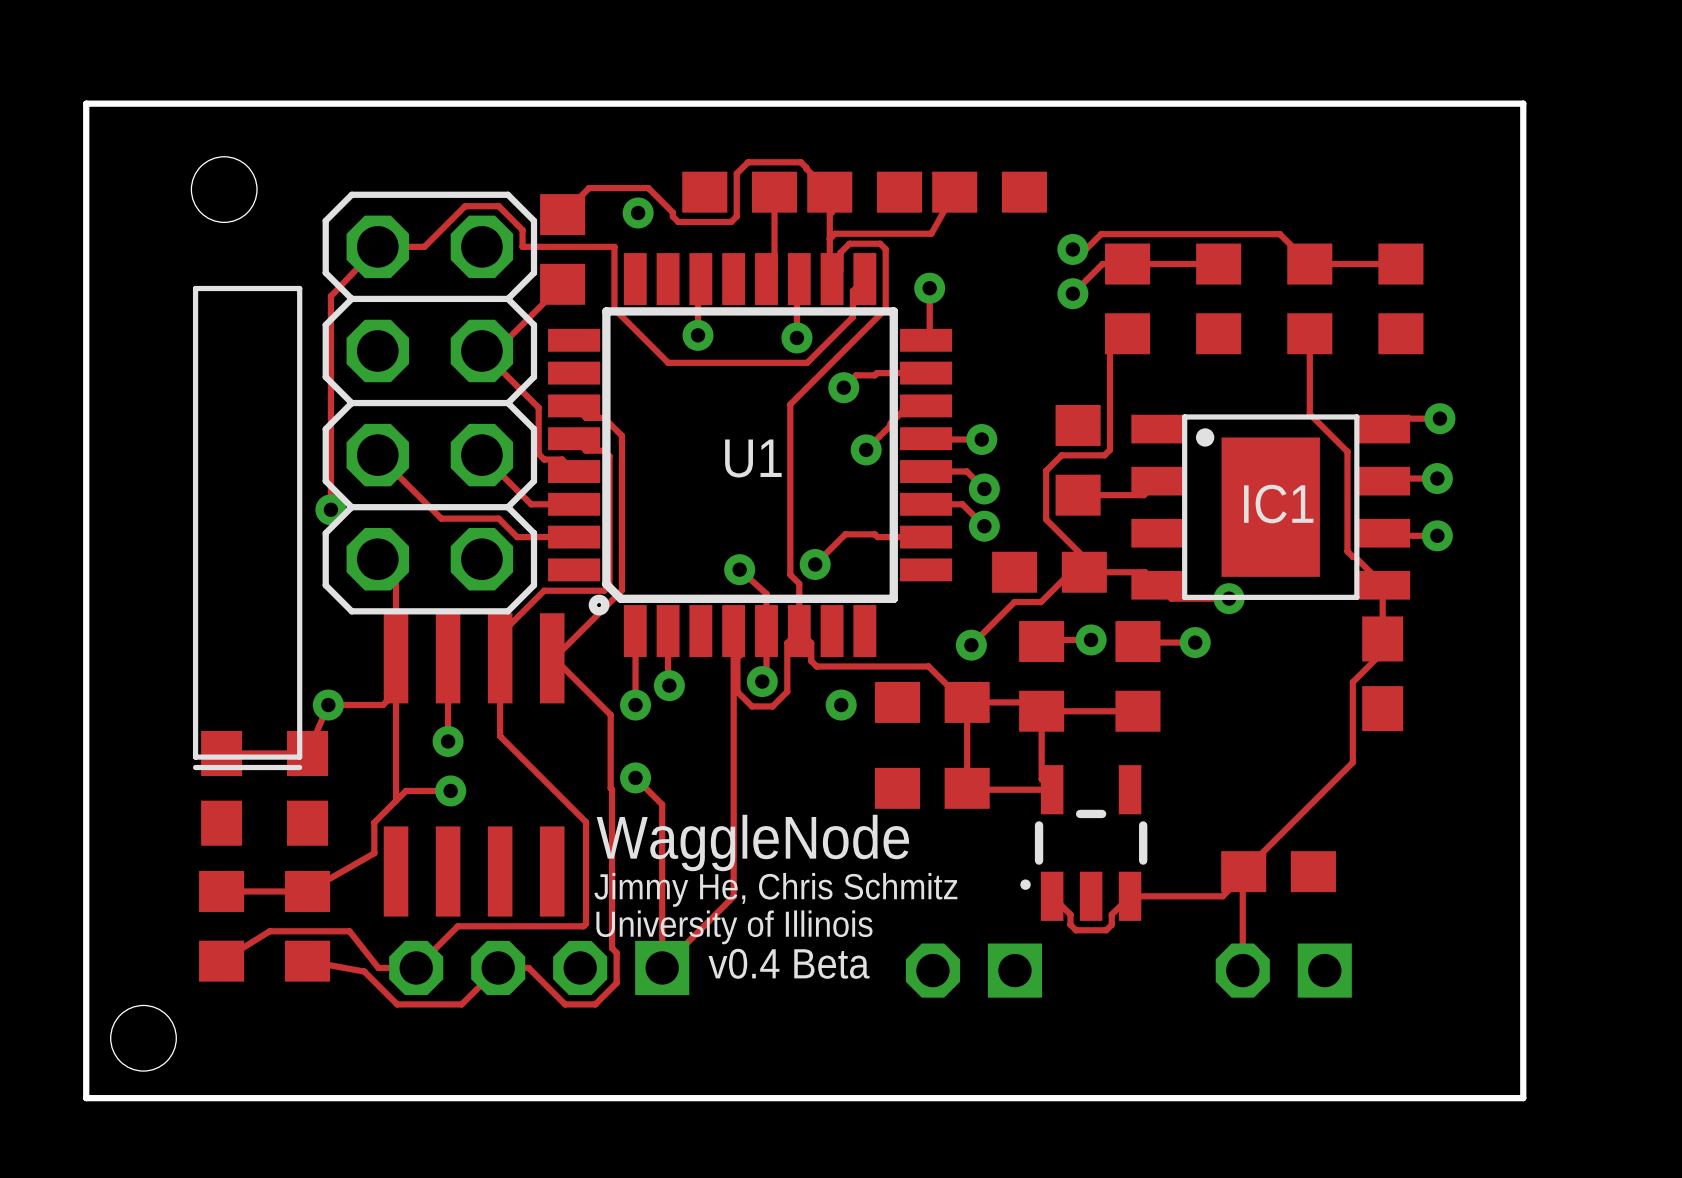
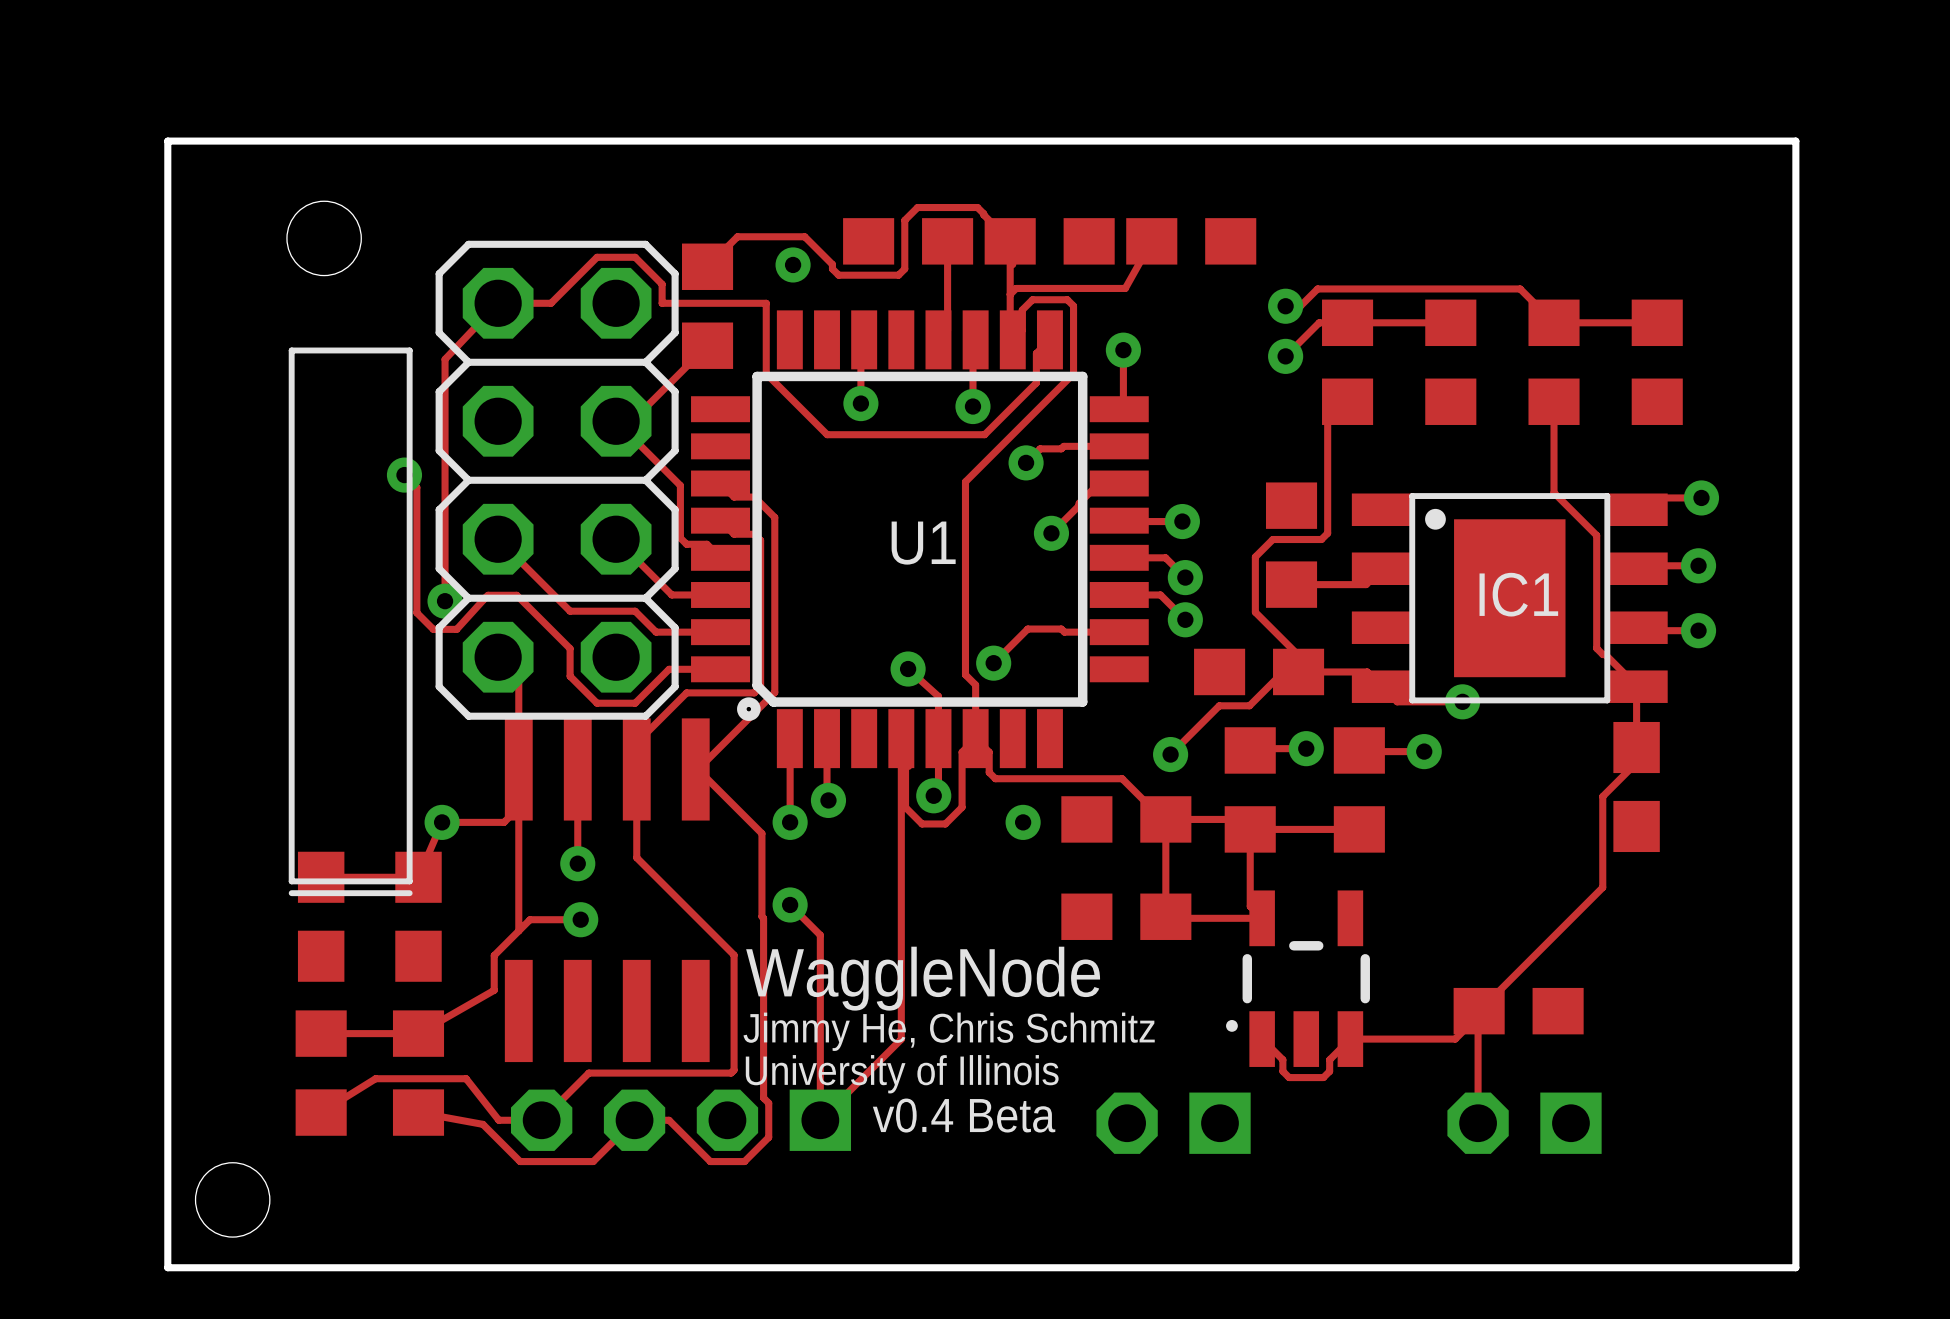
track: none -> (404, 475) (416, 487) (416, 612) (433, 629) (456, 629) (486, 597)
via: none -> (404, 475)
track: none -> (484, 599) (488, 595) (516, 595) (570, 648) (570, 676) (597, 703) (635, 703) (669, 669) (720, 669)

